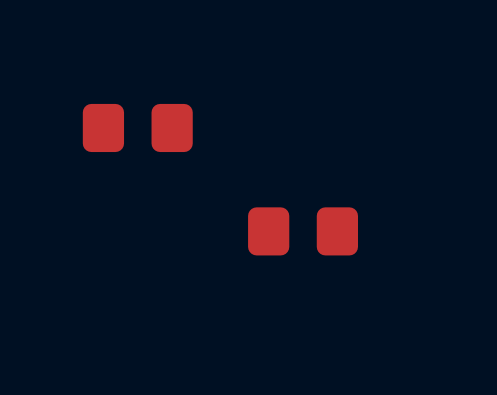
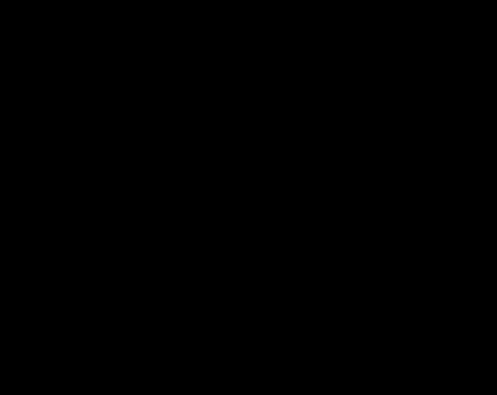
part: (137, 127) -> none
part: (303, 231) -> none

